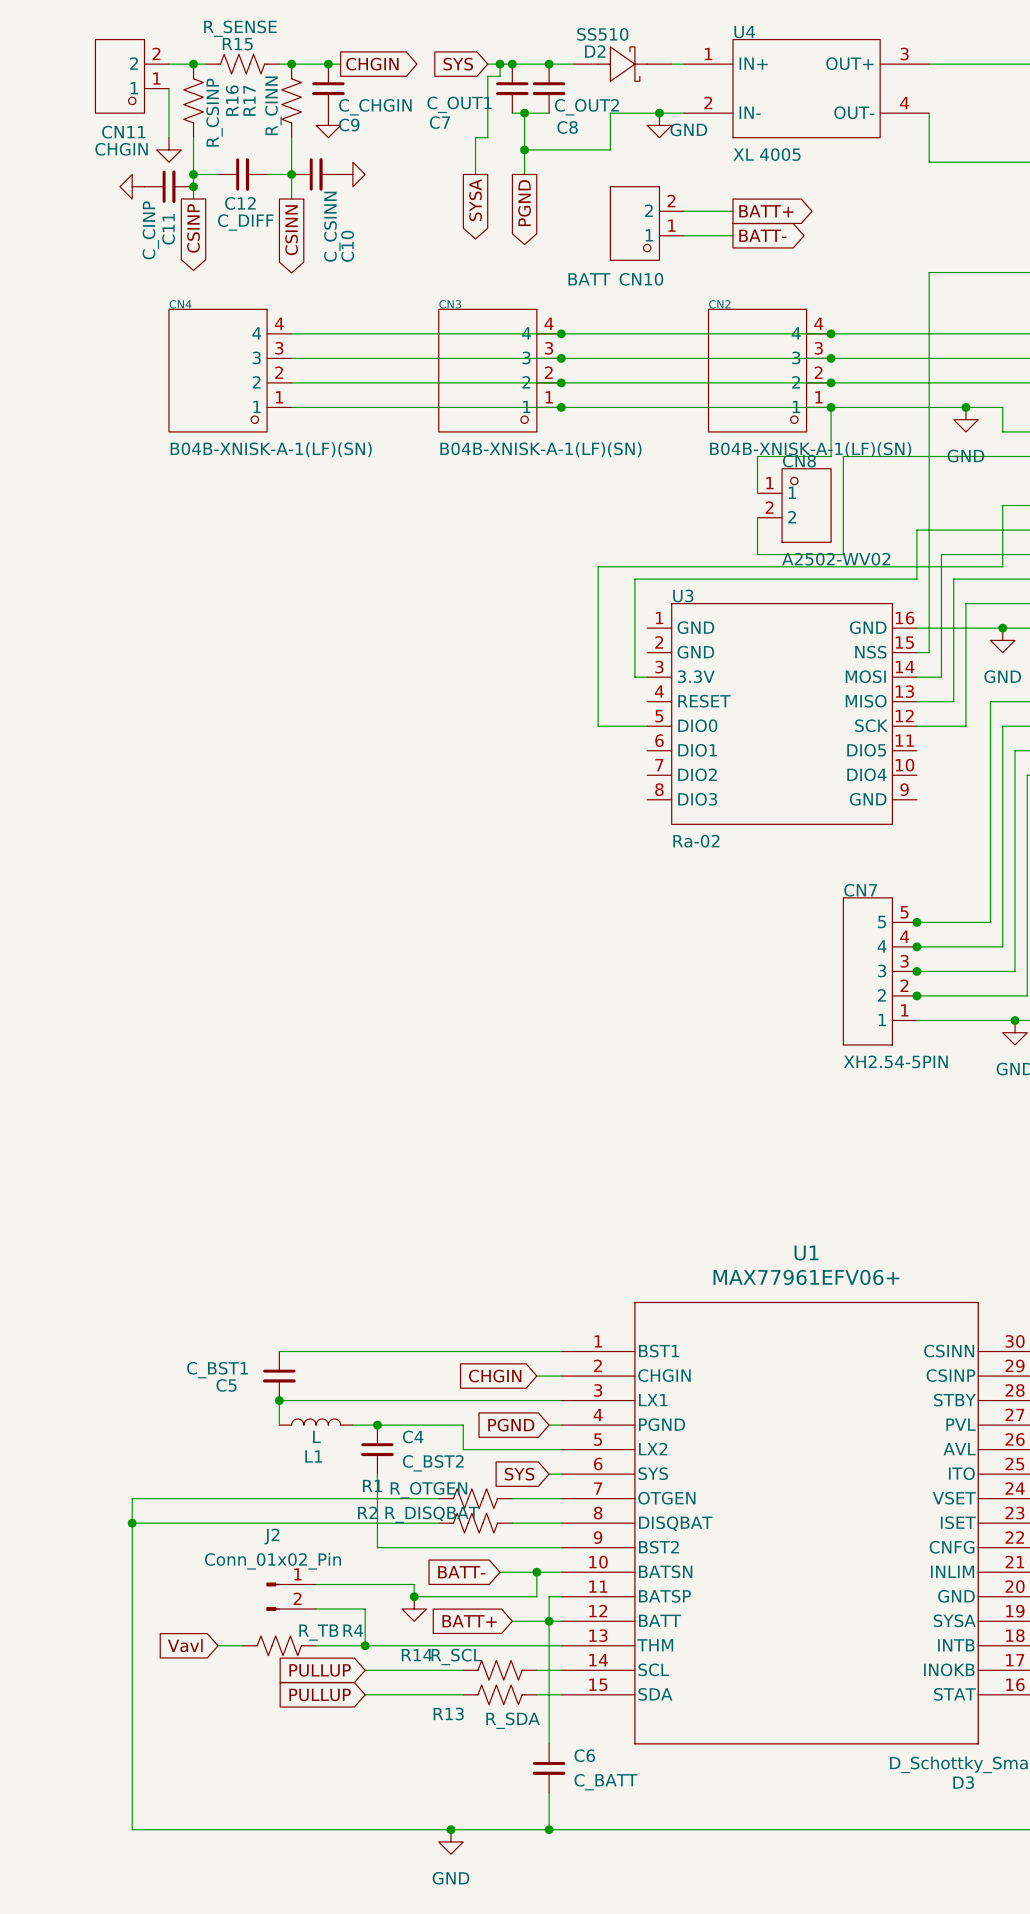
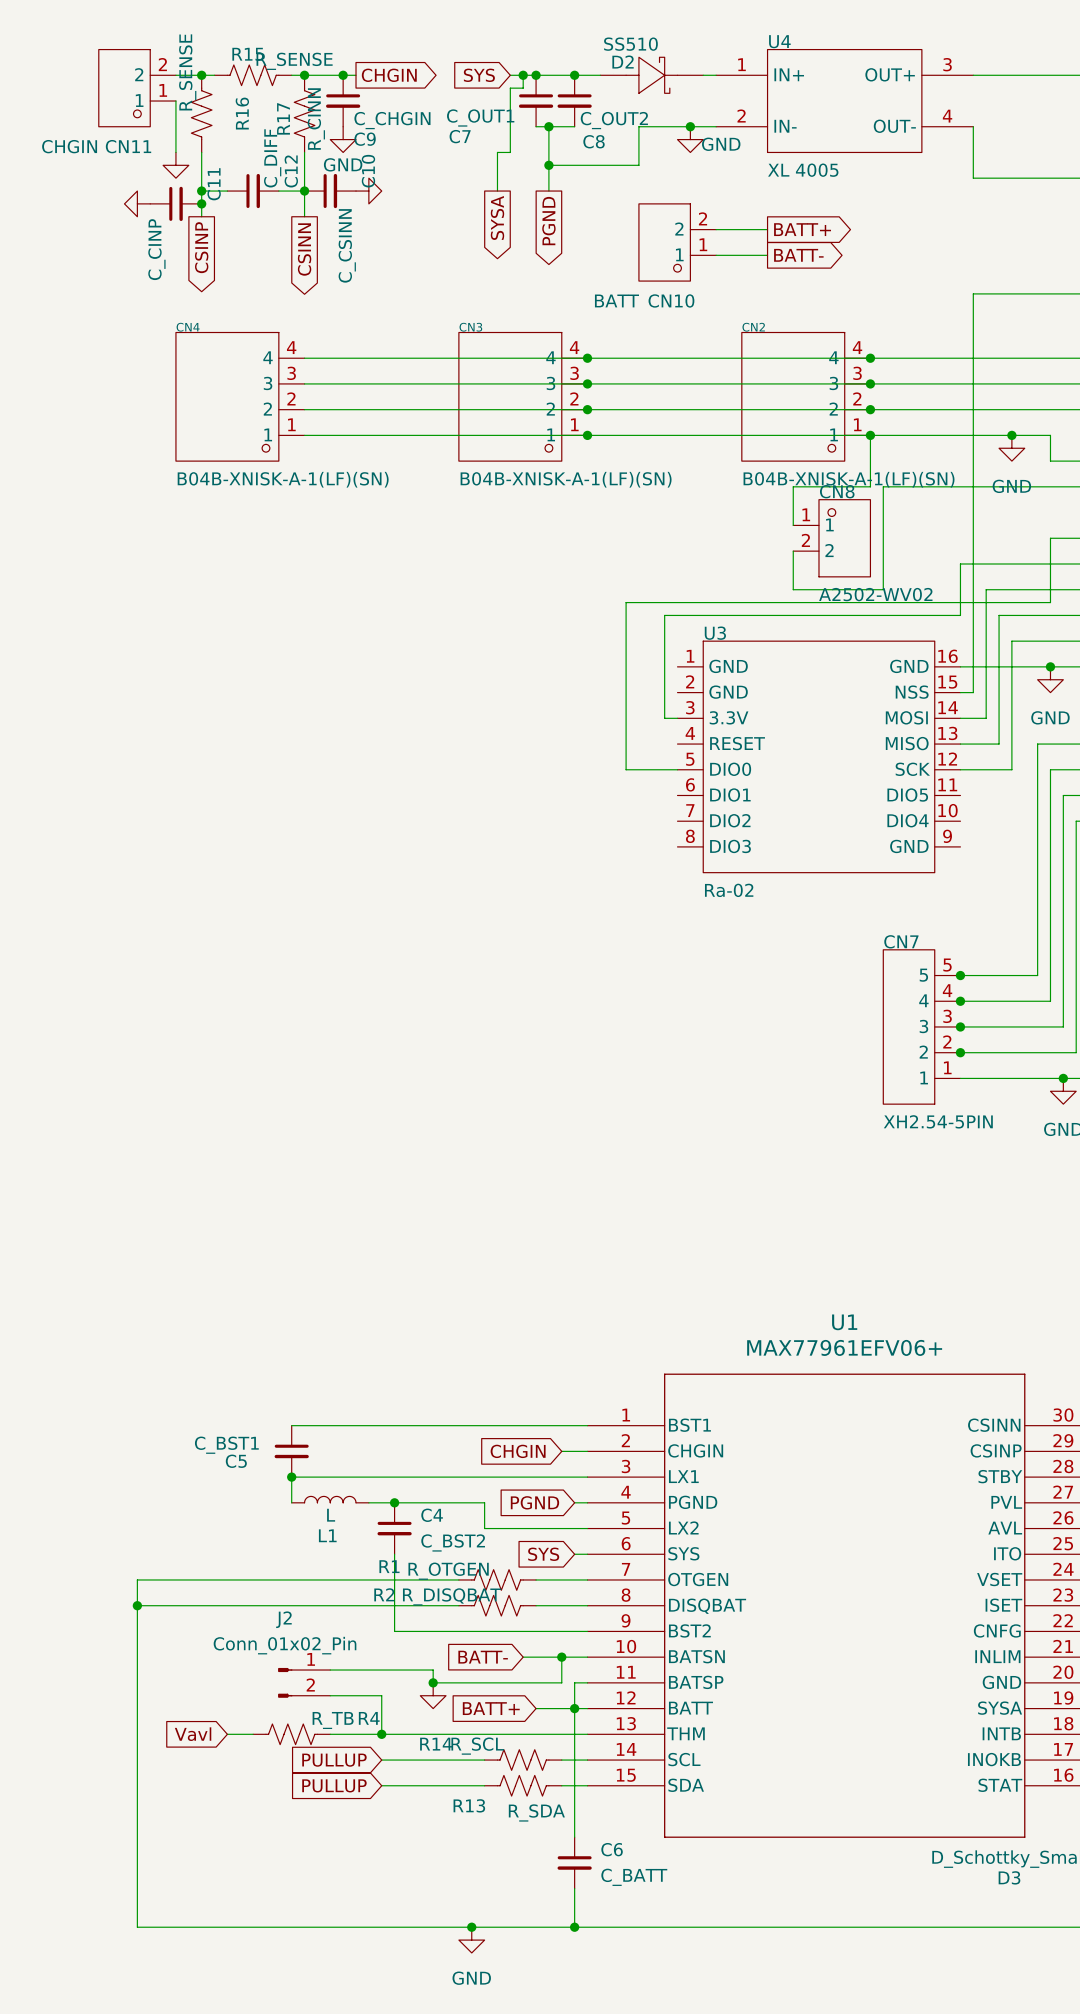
R15 value position: R_SENSE (240, 28) -> R_SENSE (294, 61)
R17 name position: R17 (249, 100) -> R17 (283, 118)
R17 value position: R_CINN (273, 105) -> R_CINN (316, 119)
R16 value: R_CSINP (214, 112) -> R_SENSE (187, 72)
CN11 value position: CHGIN (121, 149) -> CHGIN (69, 146)
power symbol text: none -> GND (343, 164)
C12 name rotation: 0° (240, 203) -> 90° counterclockwise (291, 171)
C12 name position: C12 (240, 203) -> C12 (291, 171)
C12 value rotation: 0° (245, 222) -> 90° counterclockwise (272, 158)
C12 value position: C_DIFF (245, 222) -> C_DIFF (272, 158)
C11 name position: C11 (168, 229) -> C11 (214, 184)
C10 name position: C10 (347, 246) -> C10 (368, 171)

